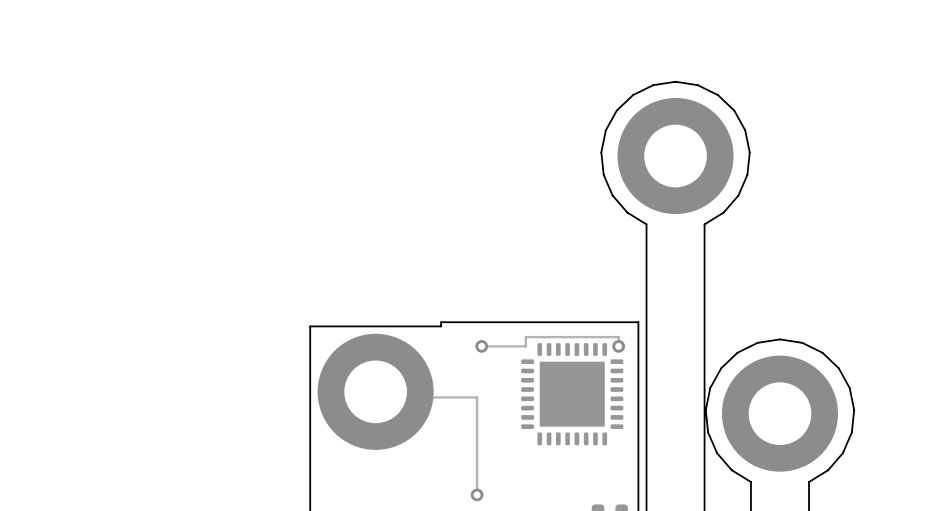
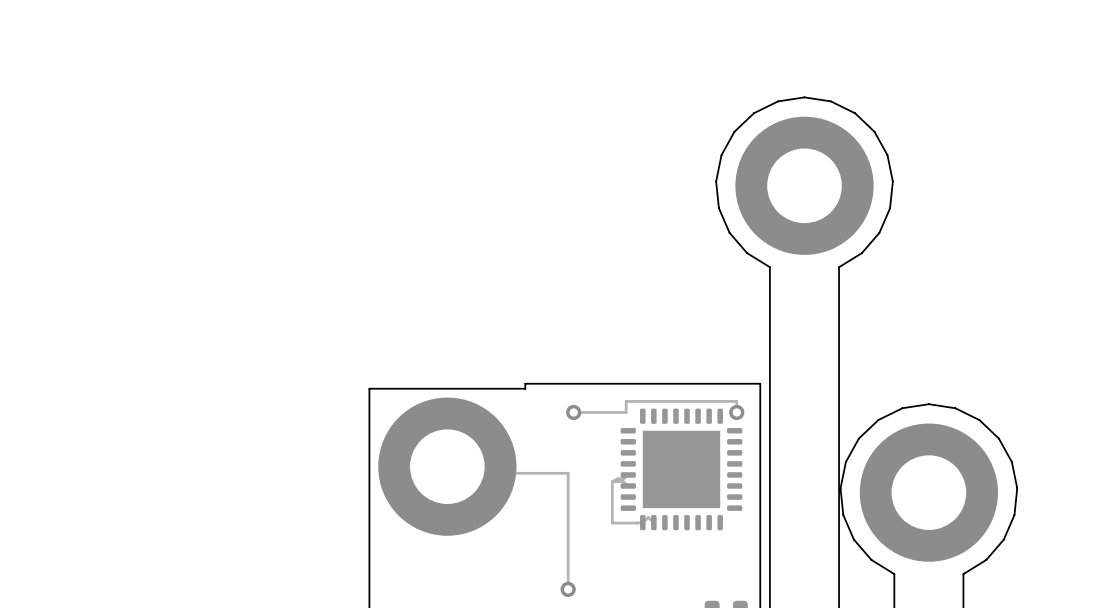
track: none -> (628, 474) (623, 478) (612, 481)
track: none -> (612, 481) (623, 481) (628, 486)
track: none -> (612, 481) (612, 523) (642, 522) (648, 517) (653, 522)

